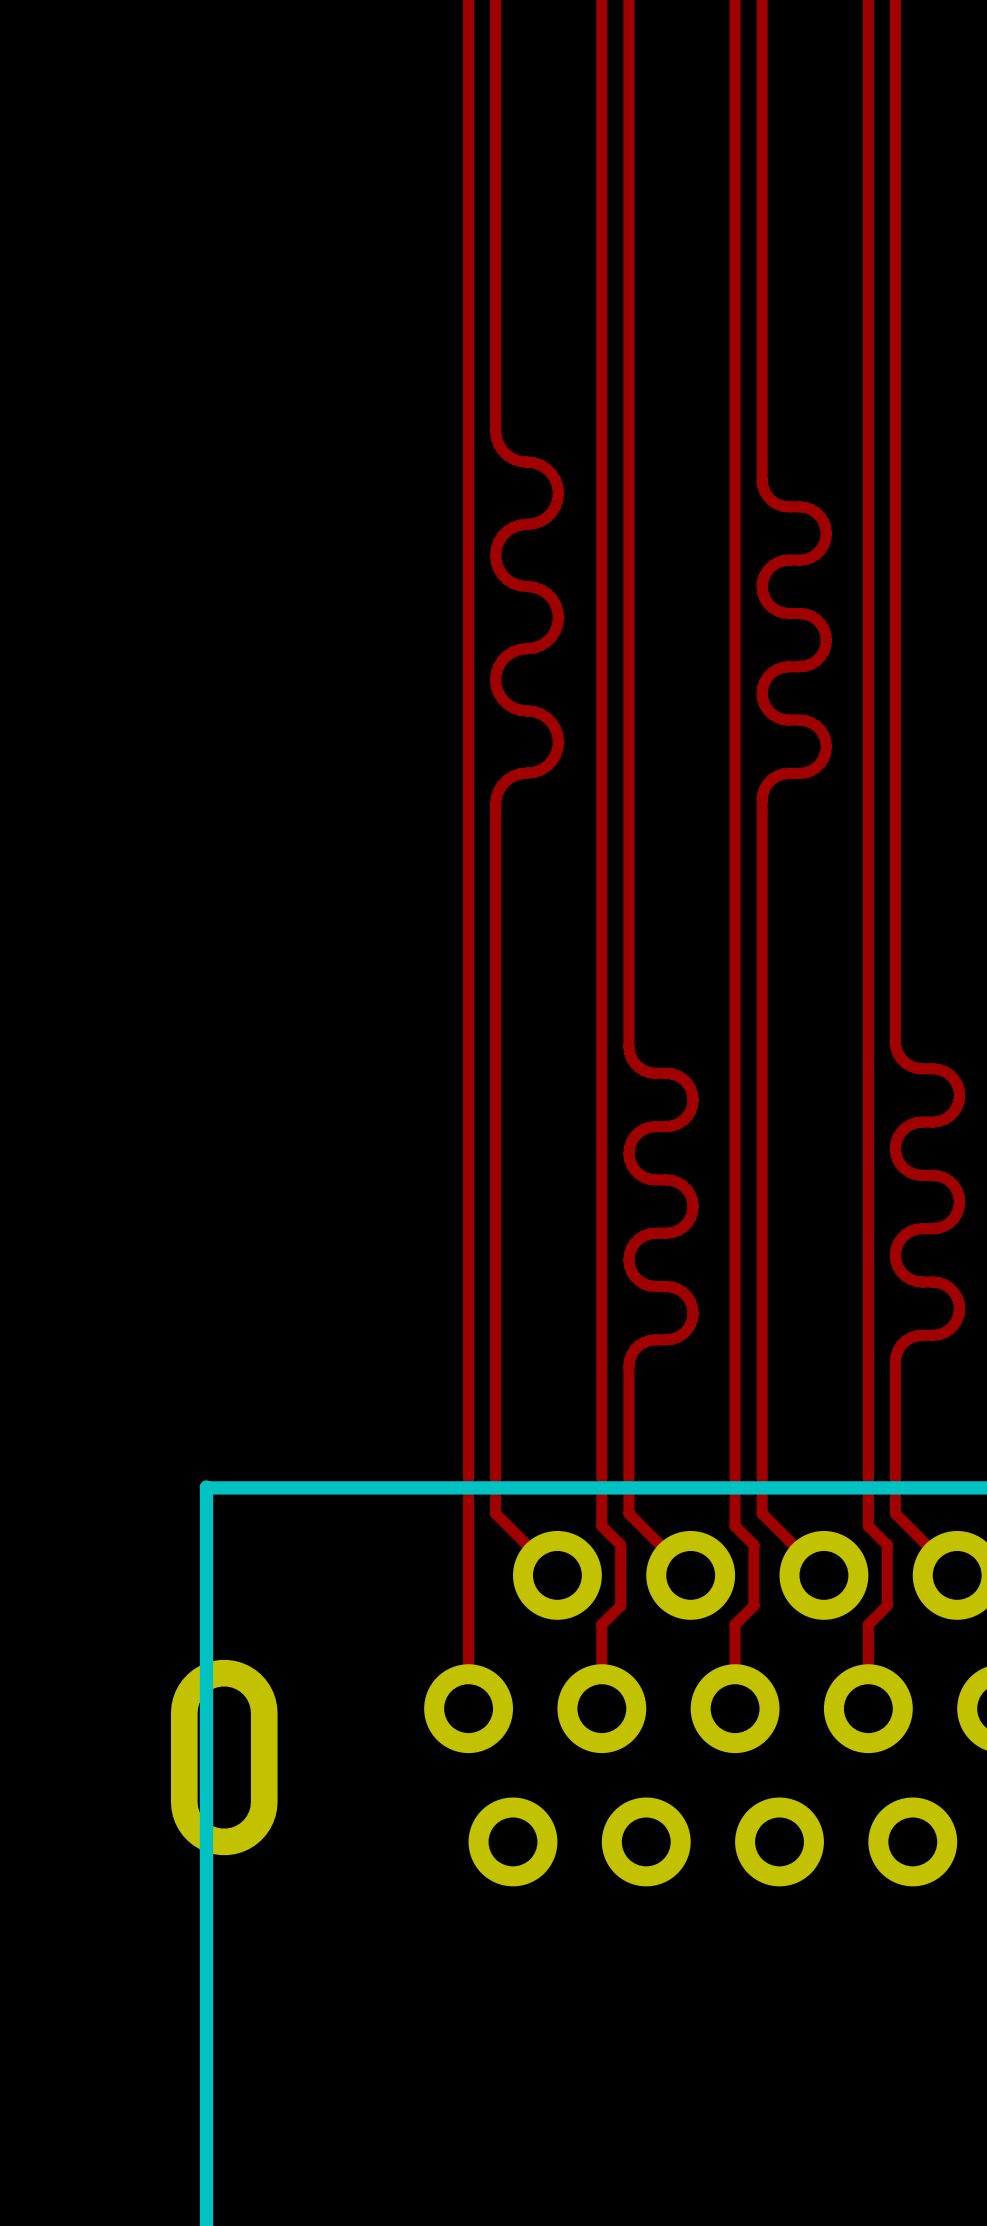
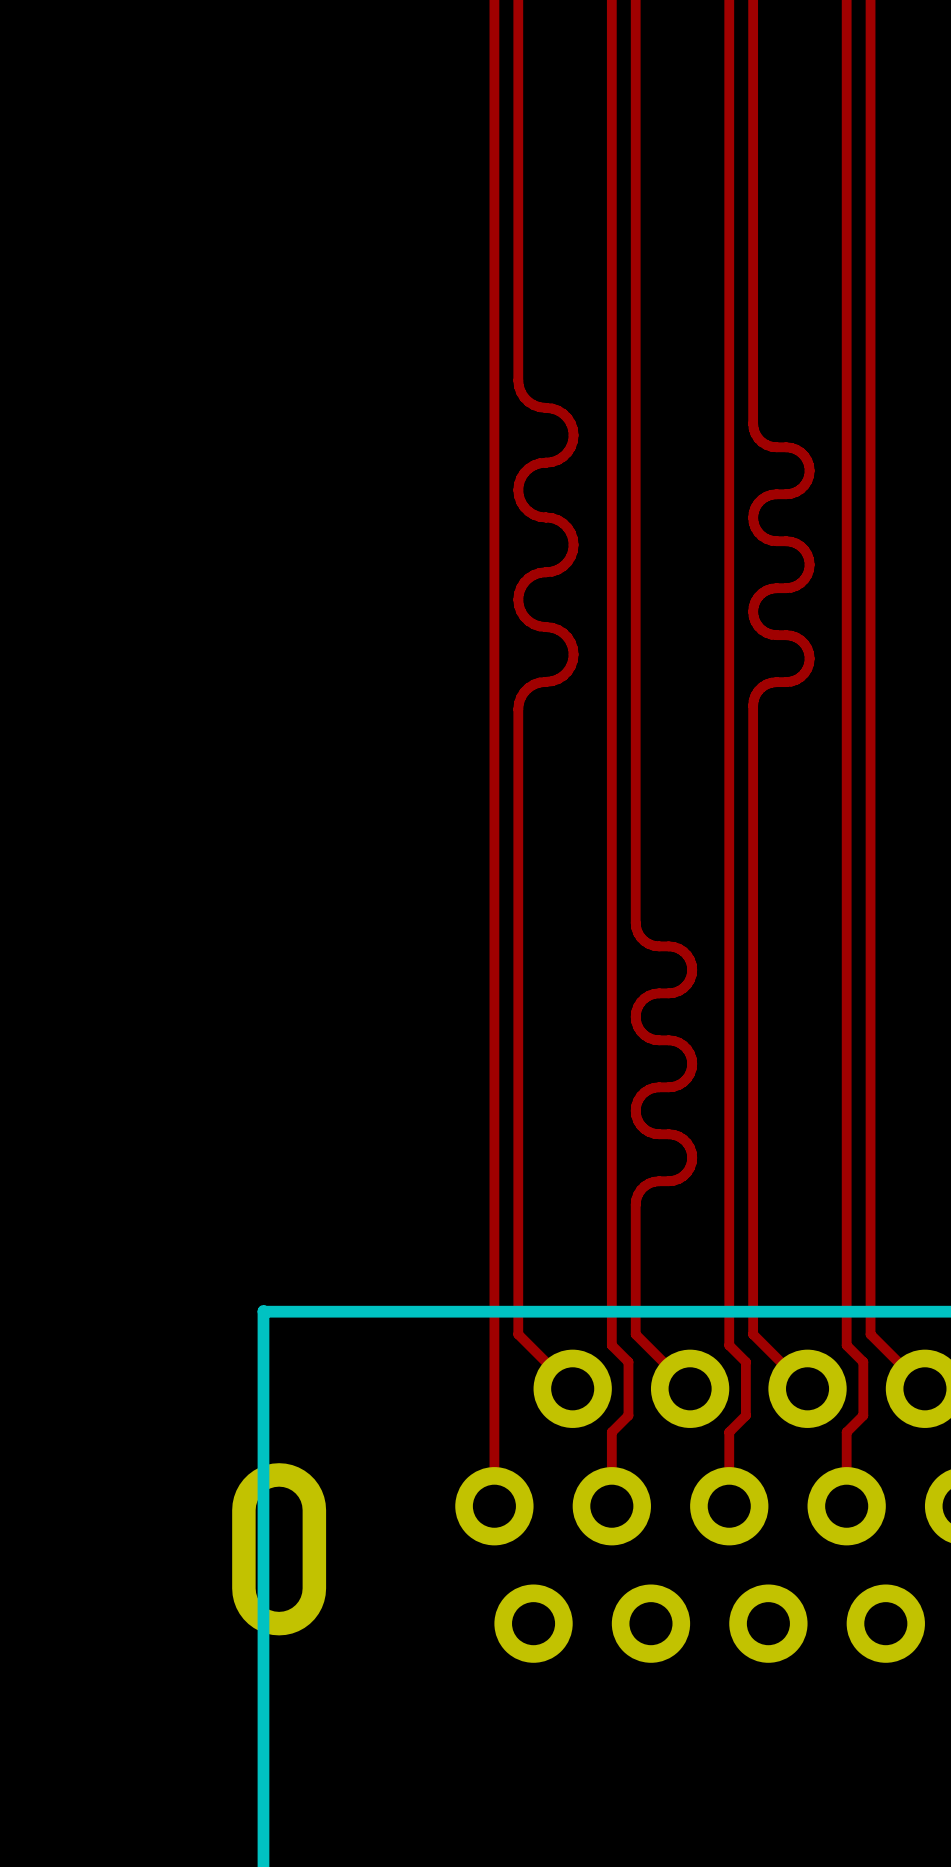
track: (895, 1042) (898, 1053) (910, 1066) (938, 1069) (949, 1074) (956, 1083) (959, 1095) (956, 1107) (949, 1116) (938, 1121) (910, 1124) (901, 1132) (896, 1142) (896, 1154) (905, 1169) (916, 1174) (944, 1178) (956, 1190) (959, 1202) (956, 1213) (949, 1222) (938, 1228) (916, 1229) (901, 1238) (896, 1249) (898, 1266) (910, 1279) (938, 1282) (949, 1287) (956, 1297) (959, 1308) (956, 1320) (944, 1332) (916, 1335) (905, 1341) (898, 1350) (895, 1361) -> (870, 918) (870, 1200)

